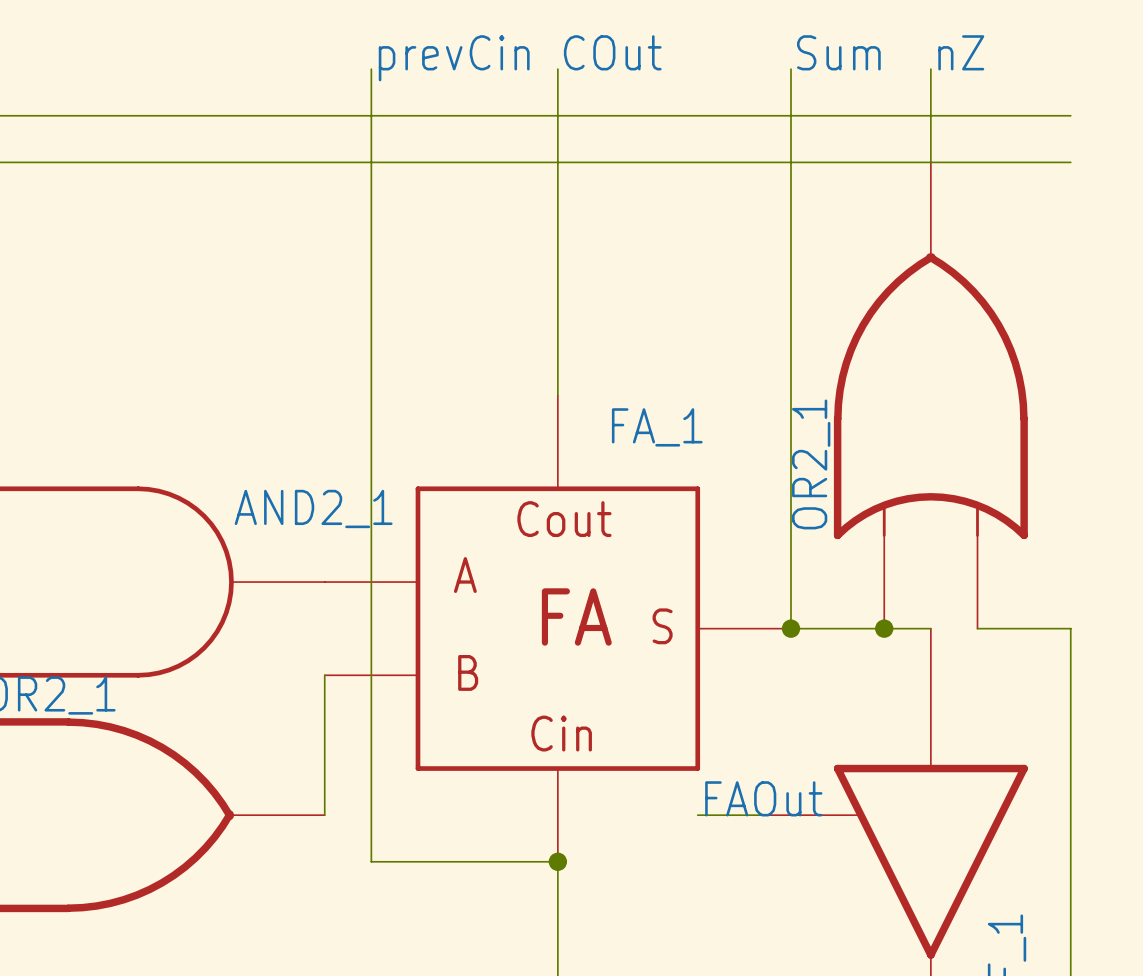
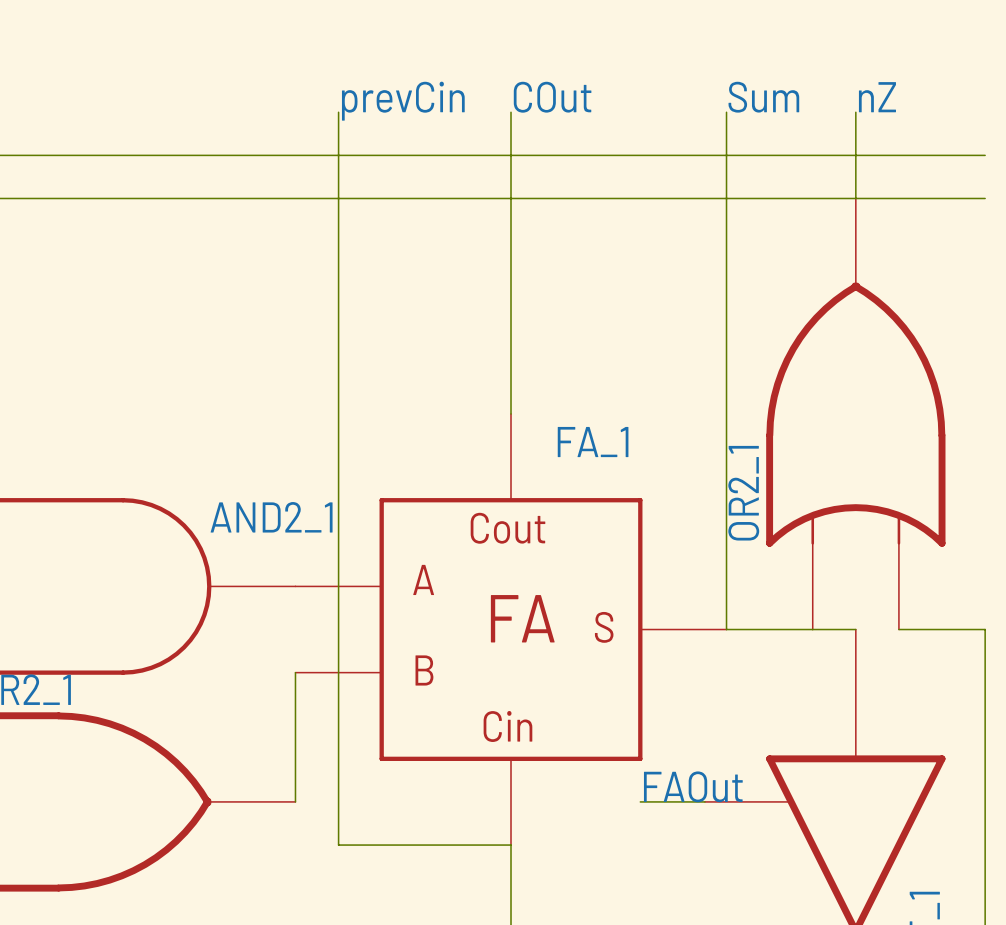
junction: (790, 628) -> none
junction: (884, 628) -> none
junction: (557, 861) -> none

